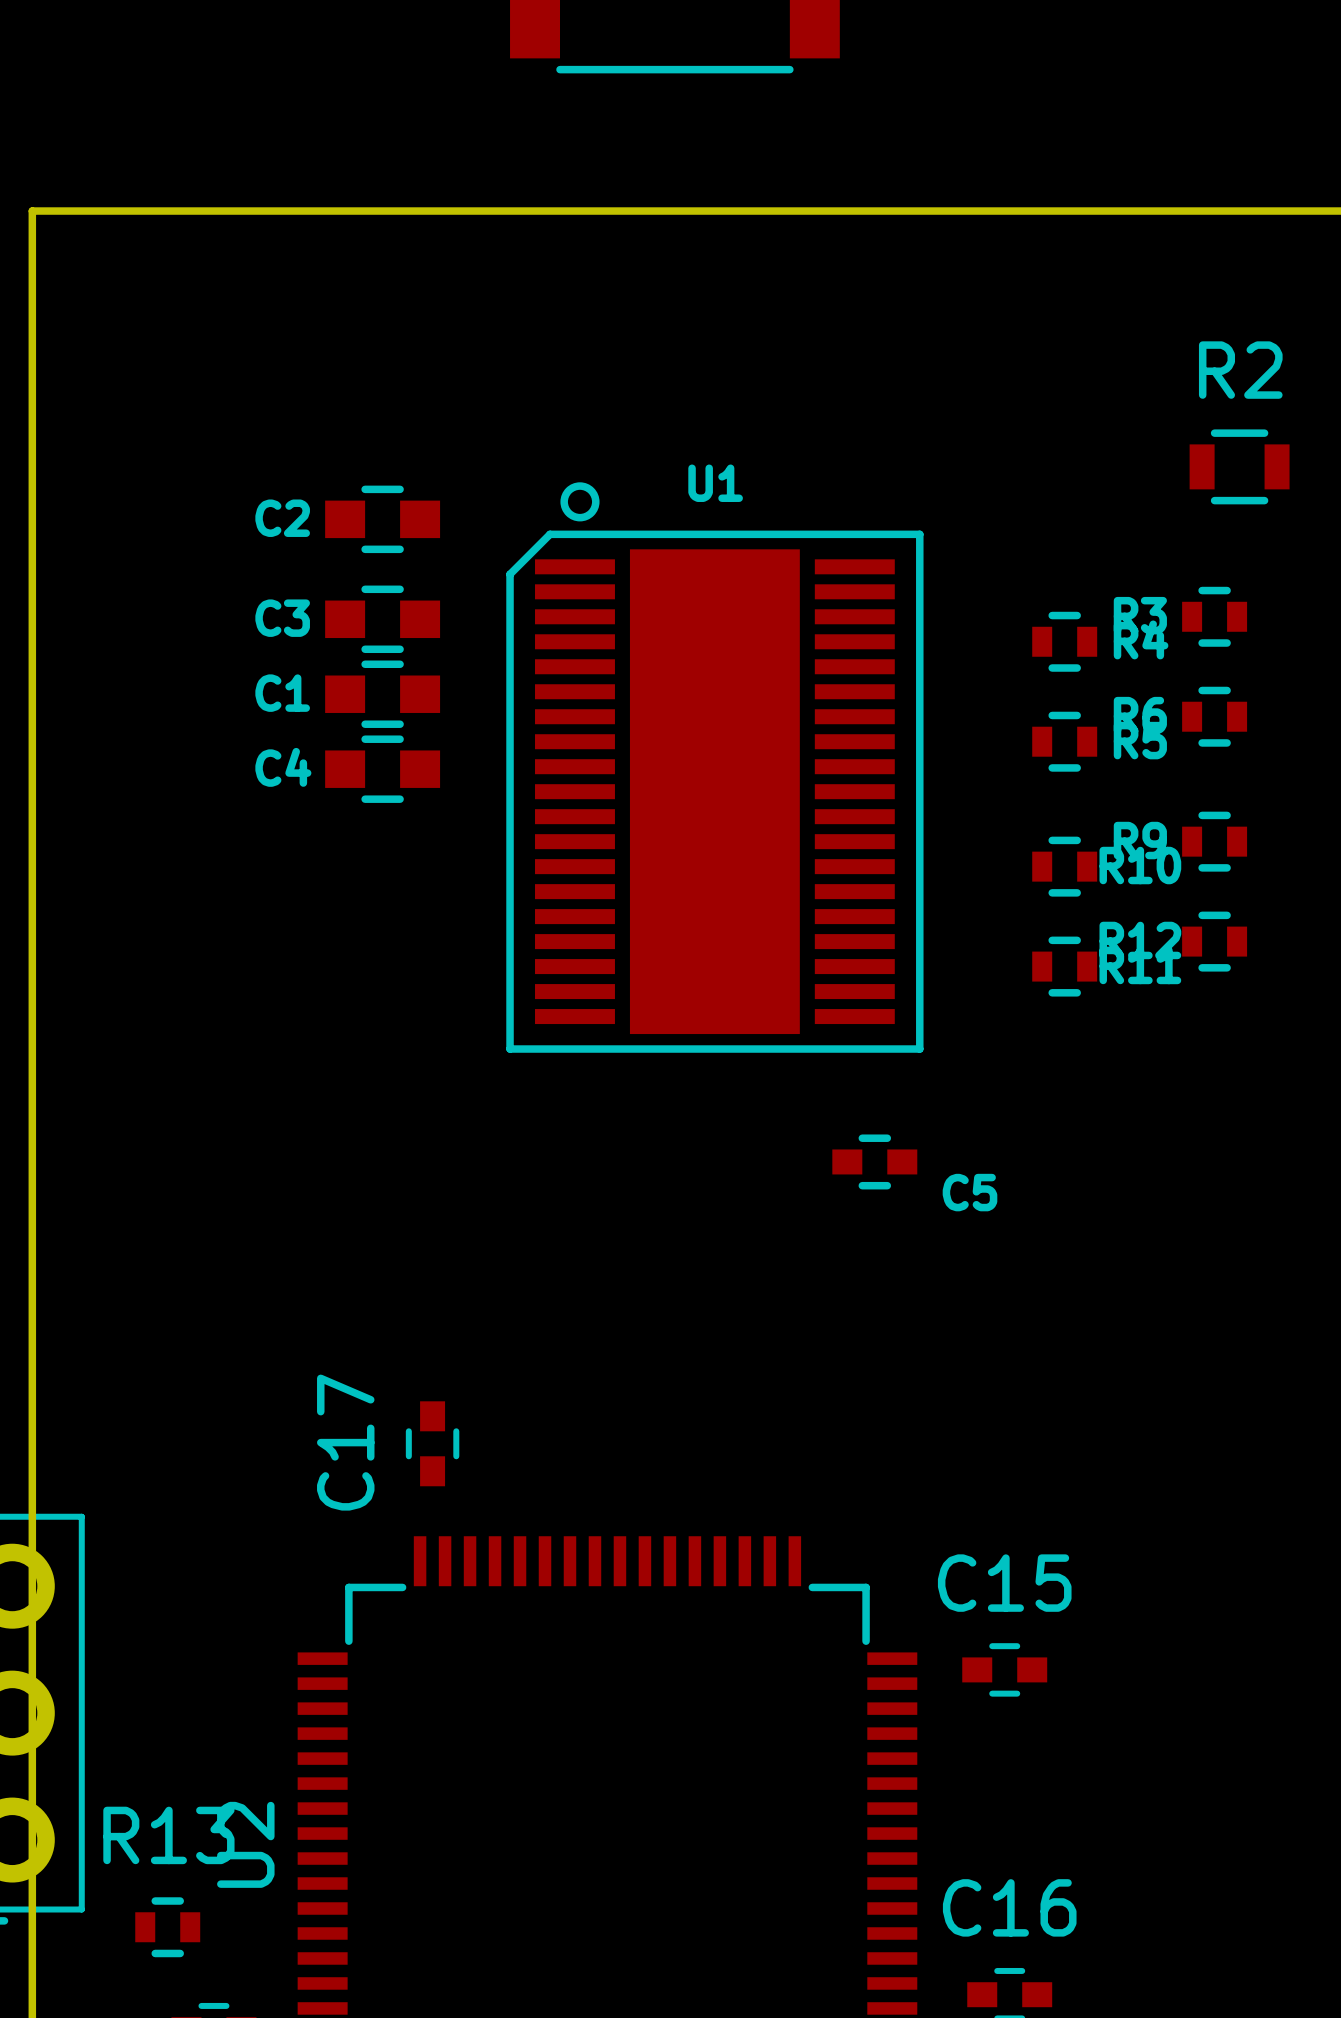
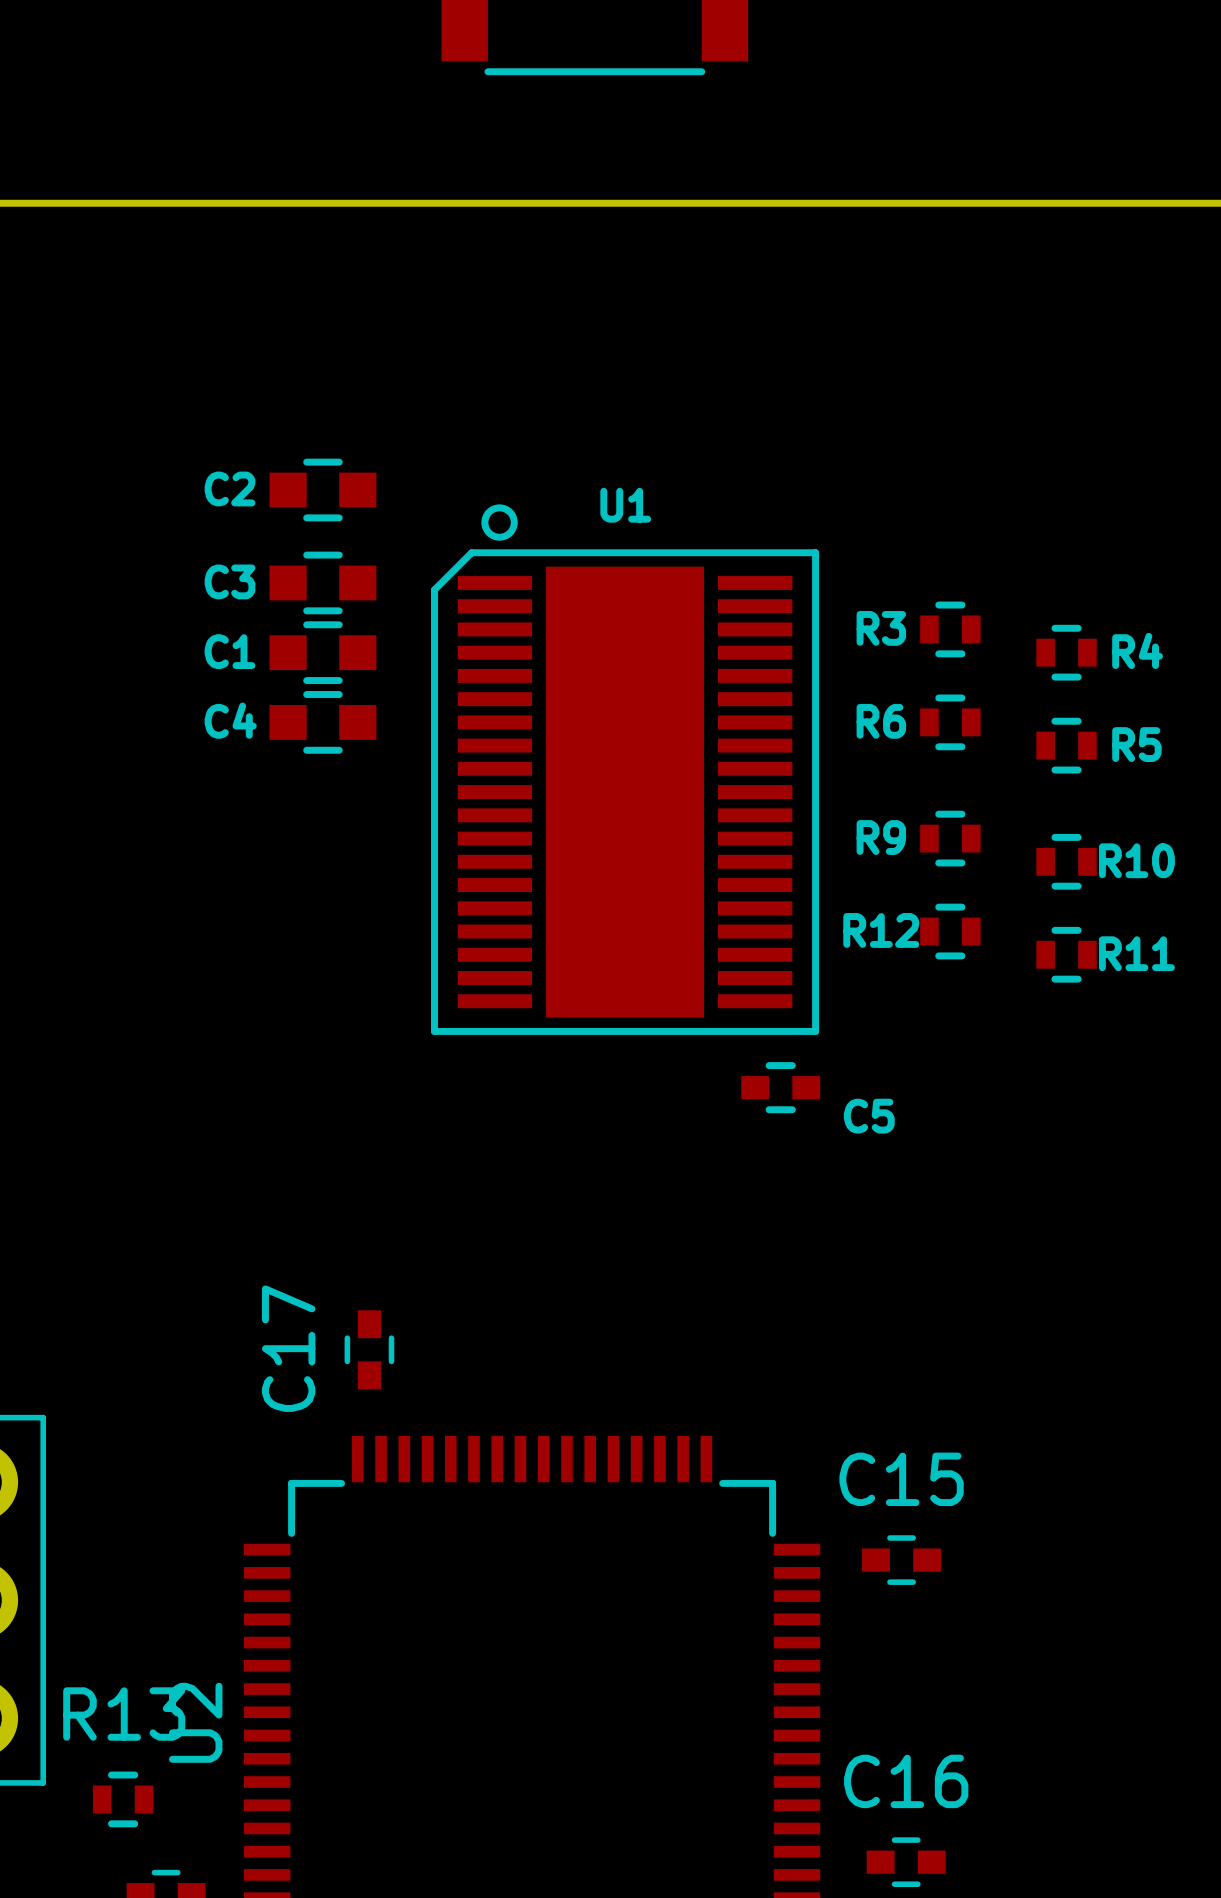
R2: (1239, 466) -> none
R3 position: (1214, 616) -> (950, 629)
R4 position: (1064, 641) -> (1066, 652)
R6 position: (1214, 716) -> (950, 722)
R5 position: (1064, 741) -> (1066, 745)
U1 position: (714, 767) -> (625, 769)
R9 position: (1214, 841) -> (950, 838)
R10 position: (1064, 866) -> (1066, 861)
R12 position: (1214, 941) -> (950, 931)
R11 position: (1064, 966) -> (1066, 954)

